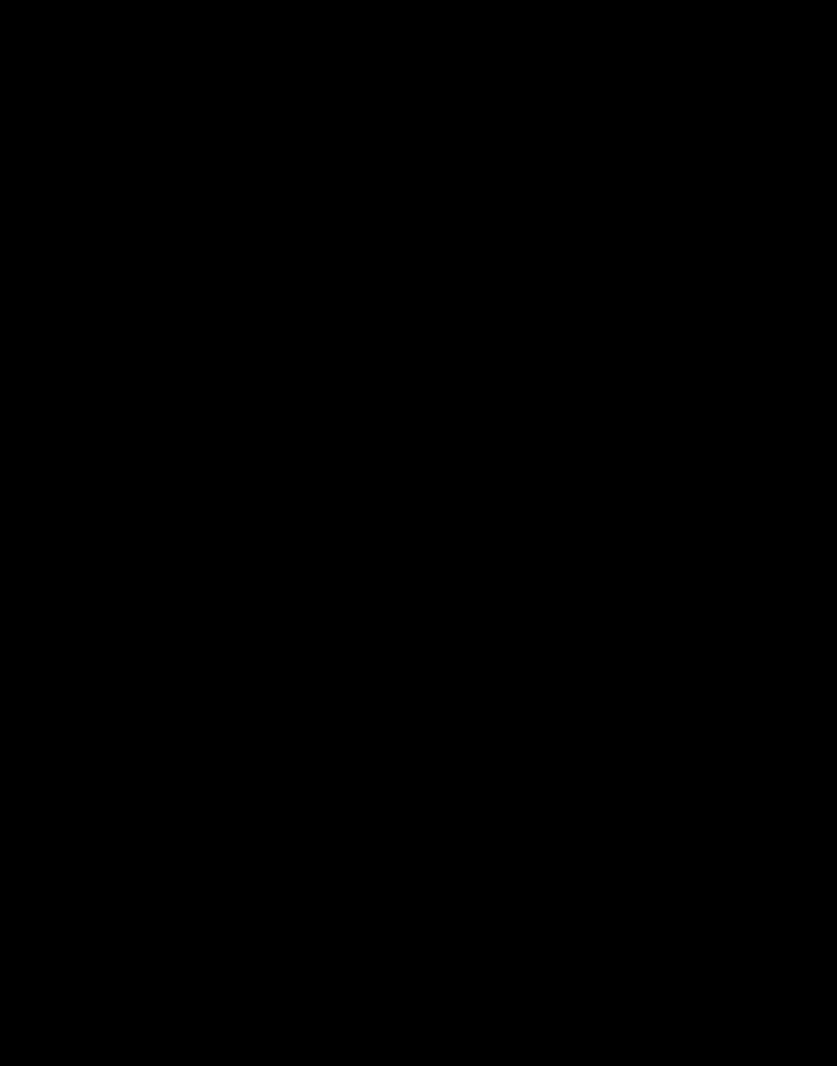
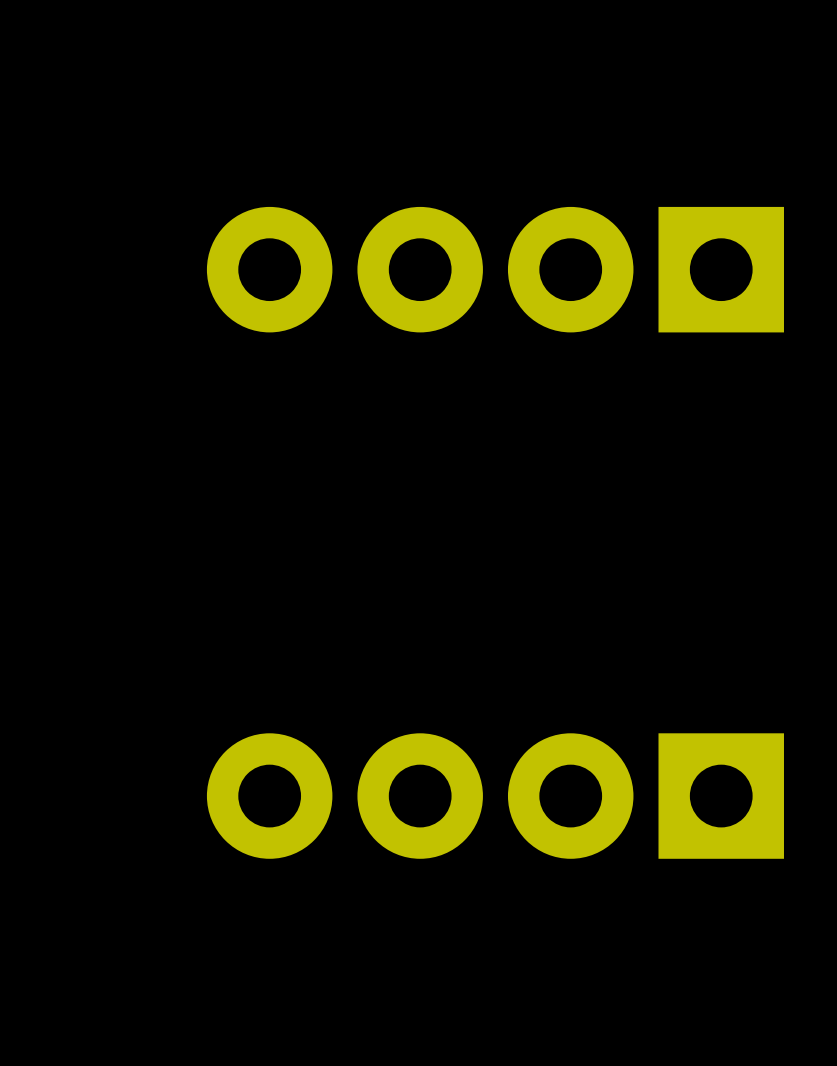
part: none -> (495, 269)
part: none -> (495, 796)

